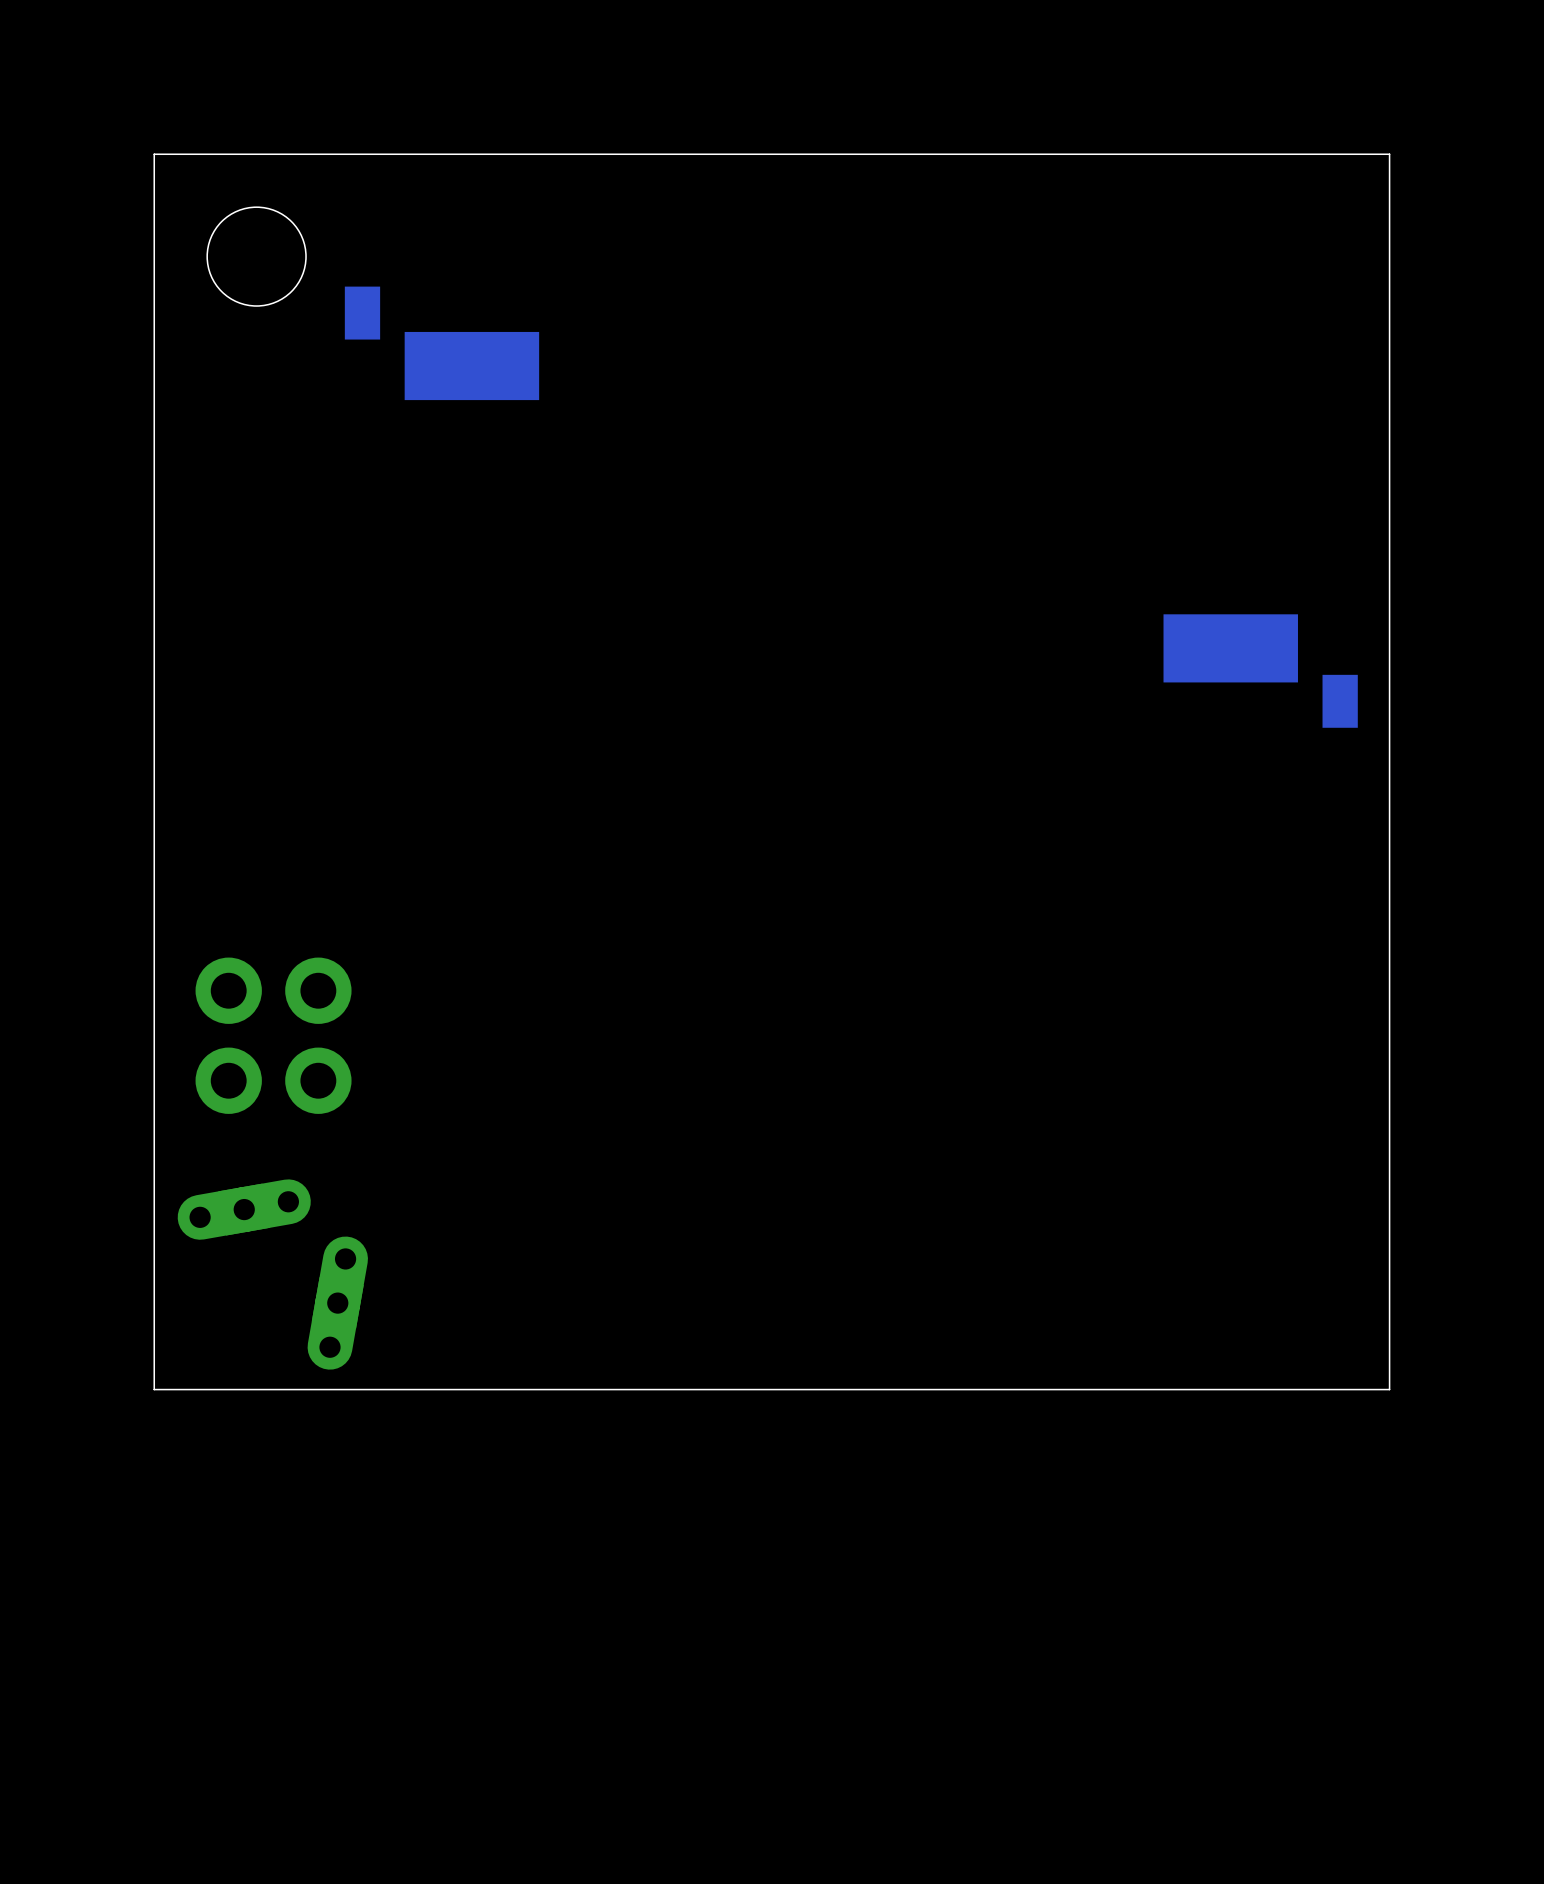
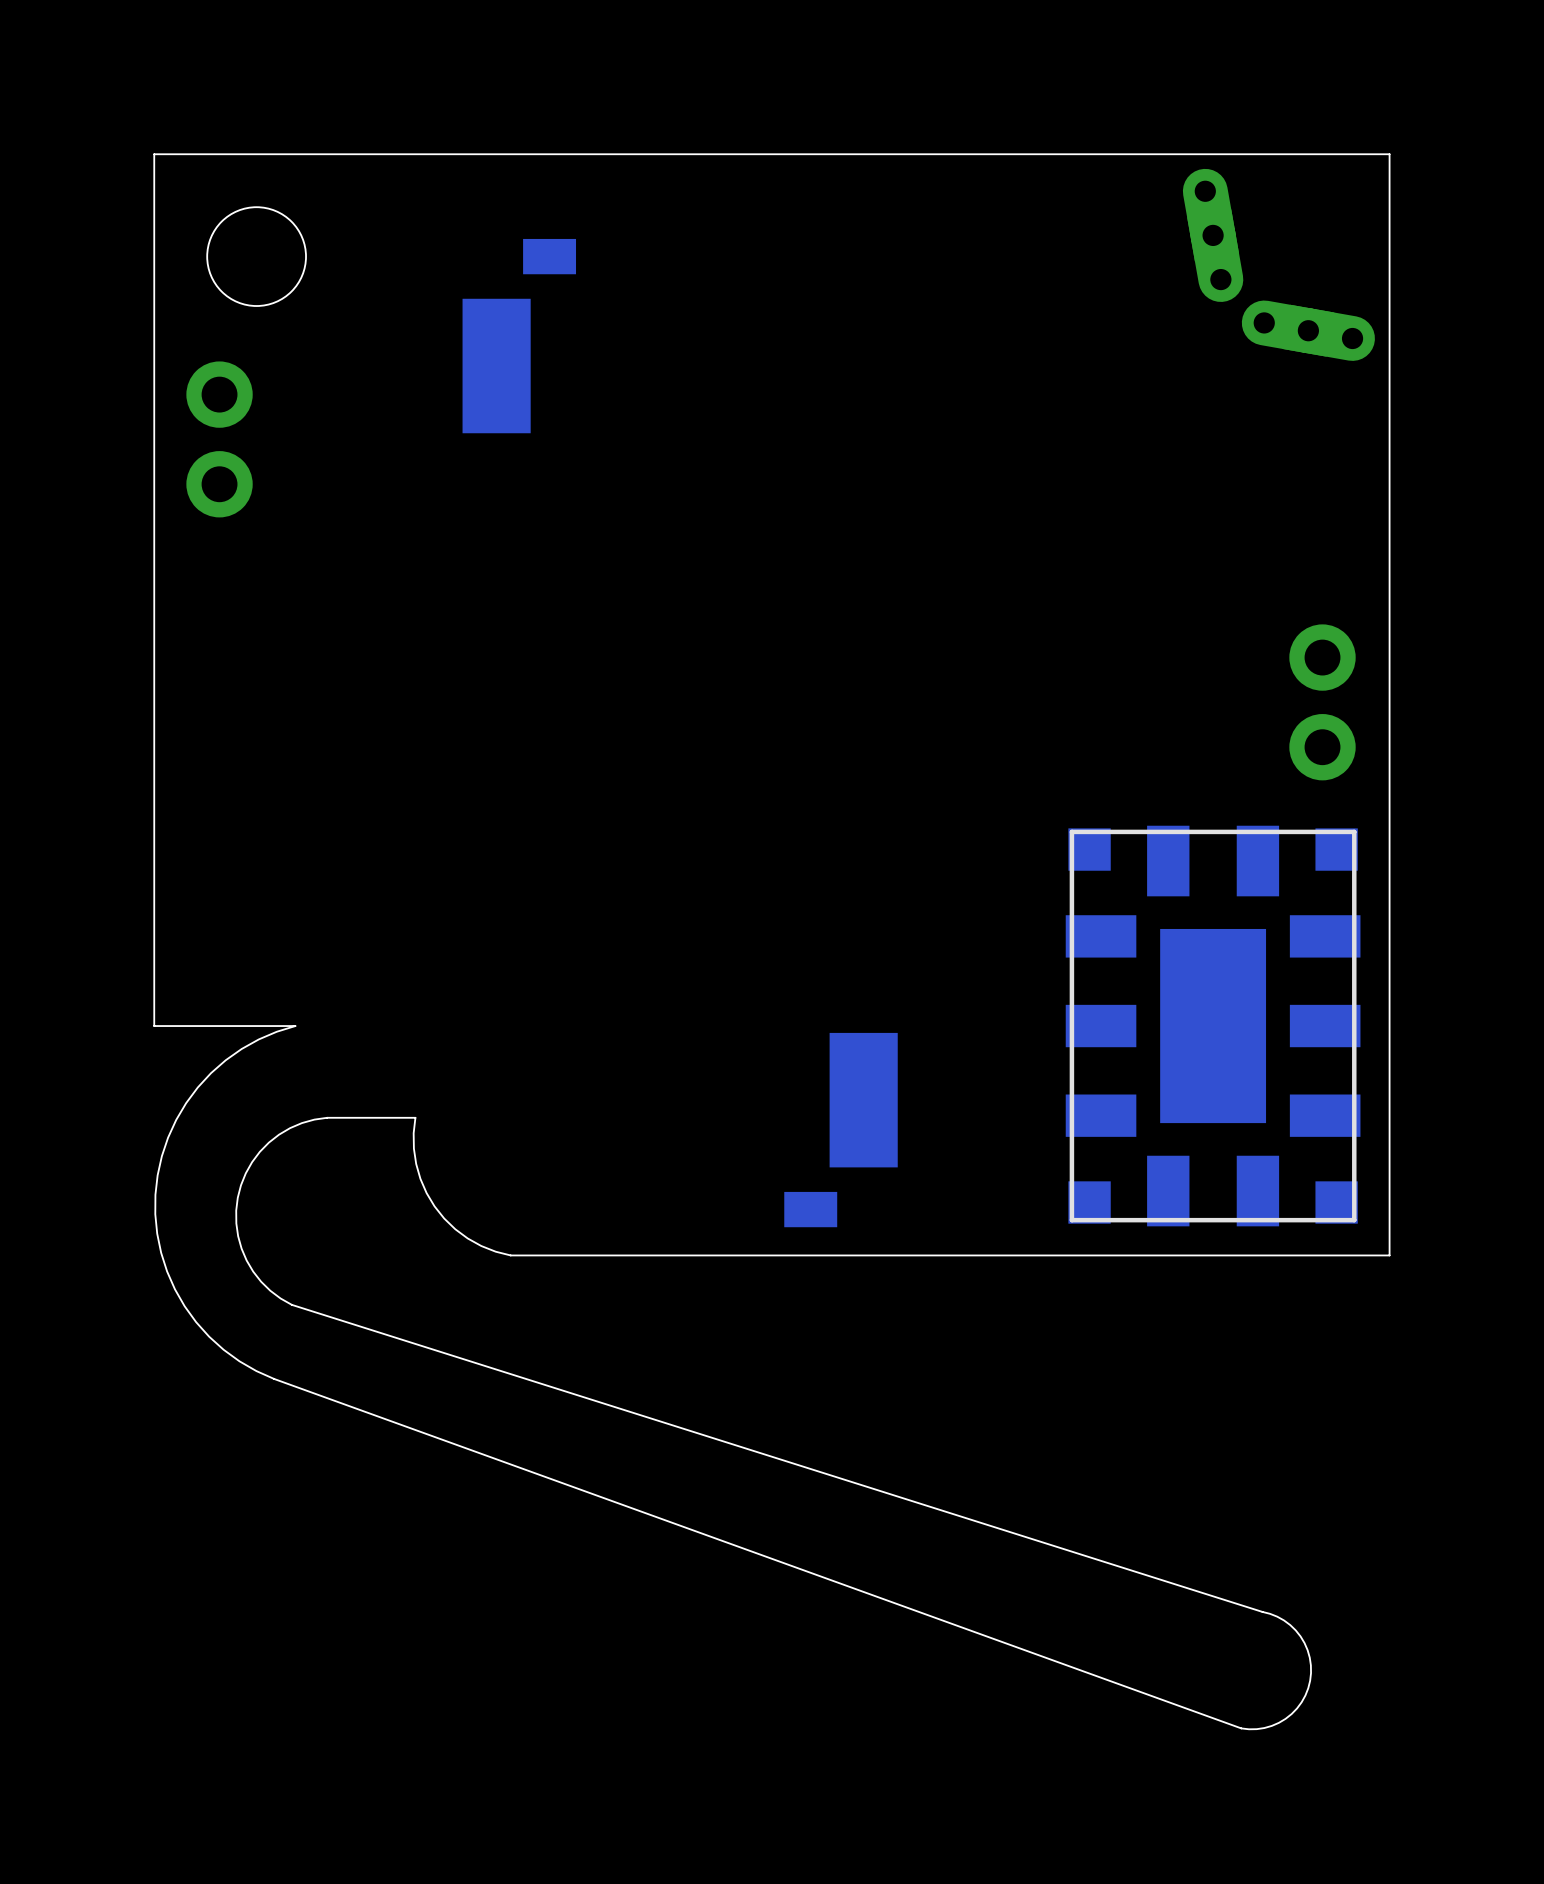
part: none -> (1213, 235)
part: none -> (1308, 330)
part rotation: 0° (441, 343) -> 90° clockwise (519, 336)
part: none -> (219, 439)
part: (1260, 671) -> none
part: none -> (1322, 702)
part: (273, 990) -> none
board edge: (154, 1026) (154, 1389) (1389, 1389) (1389, 1255) -> (154, 1026) (295, 1026) (258, 1039) (241, 1048) (211, 1073) (186, 1103) (176, 1119) (168, 1137) (157, 1175) (155, 1214) (161, 1252) (167, 1271) (174, 1289) (196, 1322) (209, 1336) (239, 1361) (274, 1378) (1241, 1728) (1264, 1728) (1278, 1722) (1297, 1708) (1308, 1688) (1310, 1665) (1304, 1643) (1295, 1630) (1277, 1616) (291, 1304) (270, 1290) (261, 1281) (253, 1271) (241, 1248) (236, 1223) (236, 1210) (240, 1185) (245, 1173) (259, 1151) (279, 1134) (302, 1123) (327, 1117) (415, 1117) (413, 1133) (416, 1163) (420, 1178) (434, 1206) (455, 1229) (467, 1238) (481, 1246) (510, 1255) (1389, 1255)
part: none -> (1213, 1026)
part: (273, 1080) -> none
part: none -> (841, 1130)
part: (244, 1209) -> none
part: (337, 1303) -> none

